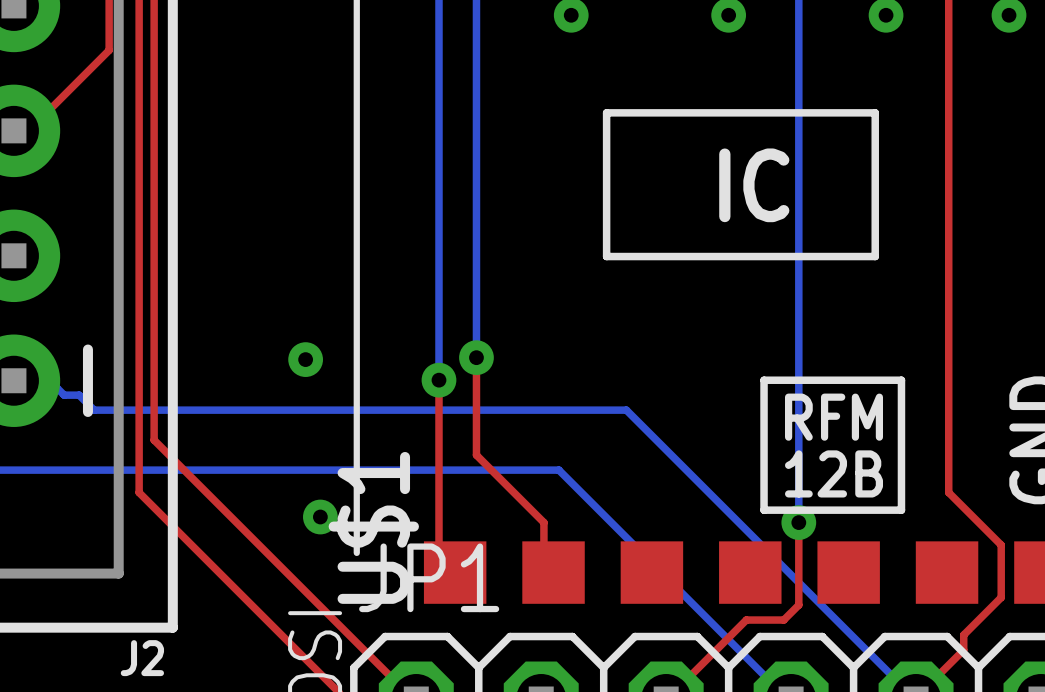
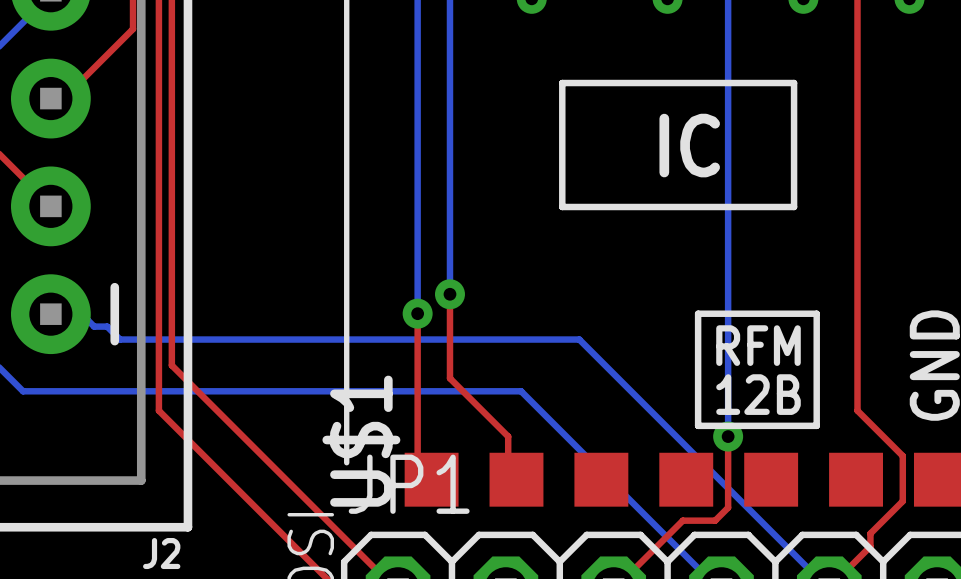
via: (305, 359) -> none
via: (320, 517) -> none

